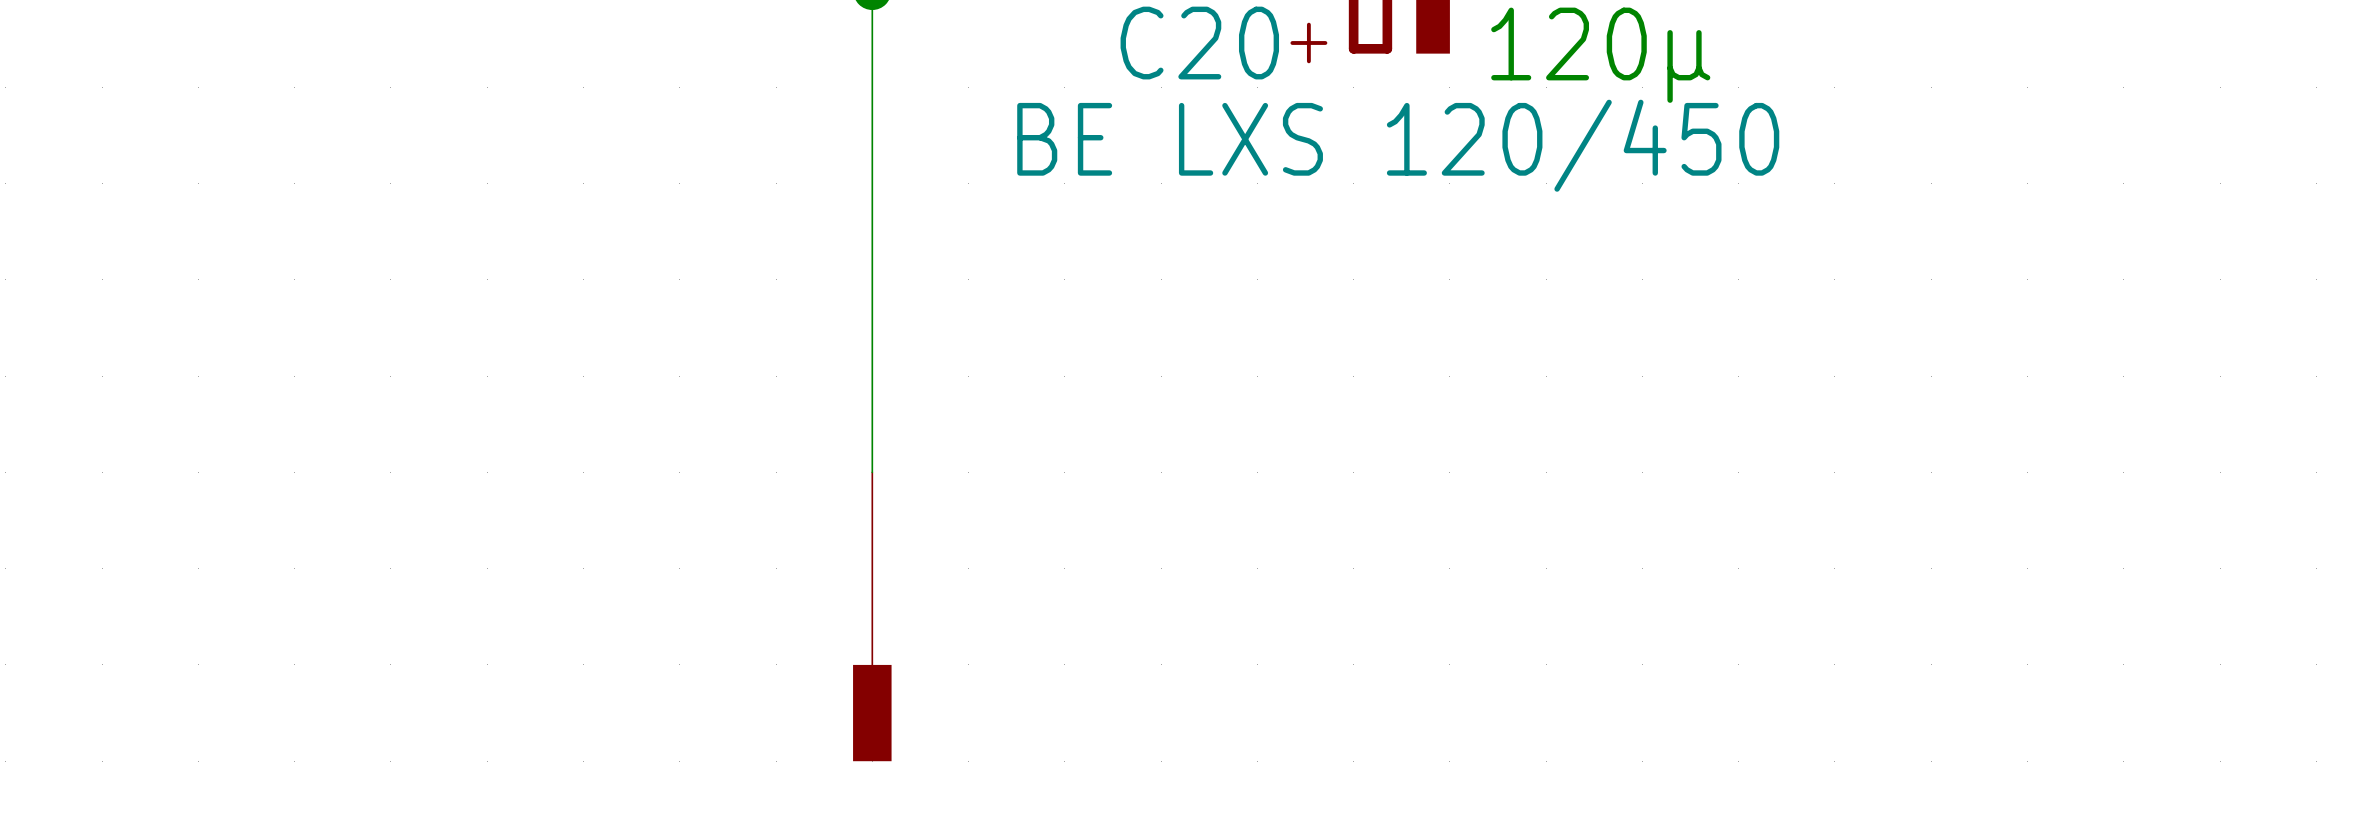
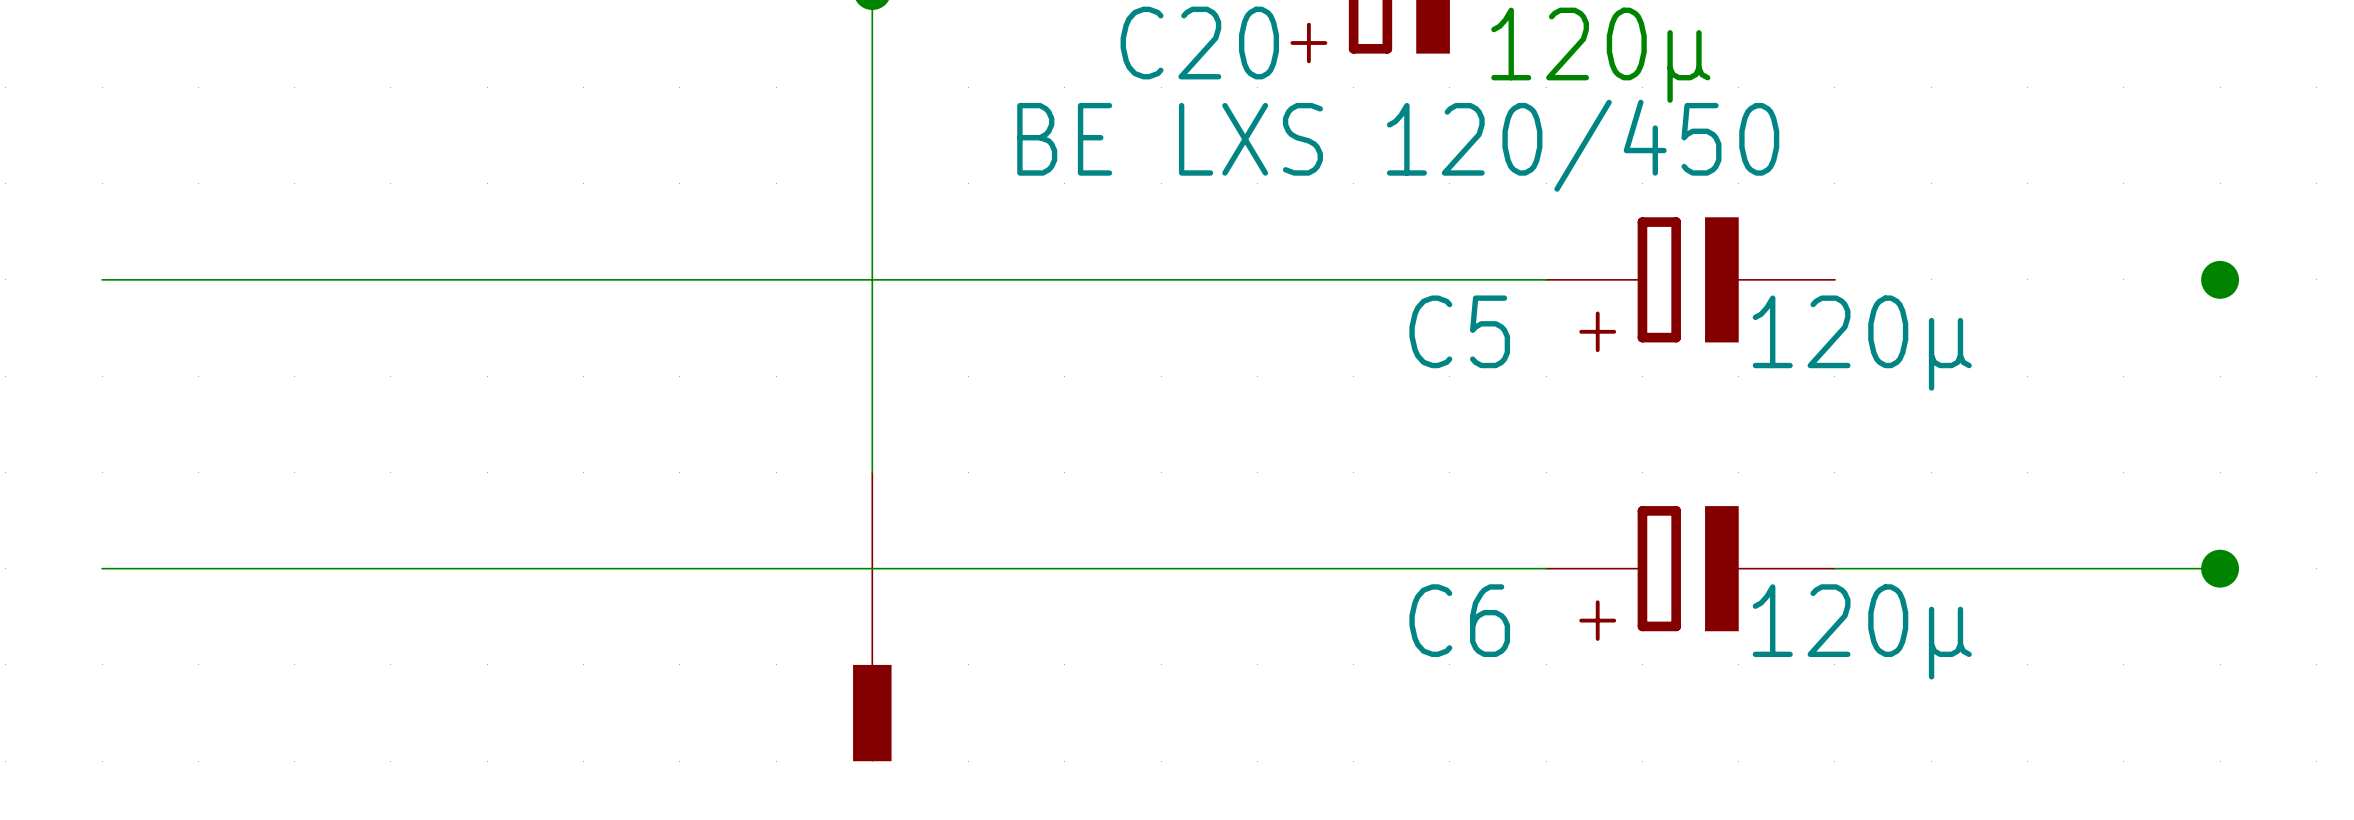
wire: none -> (102, 279) (1546, 279)
C5: none -> 120µ (1690, 279)
junction: none -> (2220, 279)
wire: none -> (102, 568) (1546, 568)
C6: none -> 120µ (1690, 568)
wire: none -> (1834, 568) (2220, 568)
junction: none -> (2220, 568)

